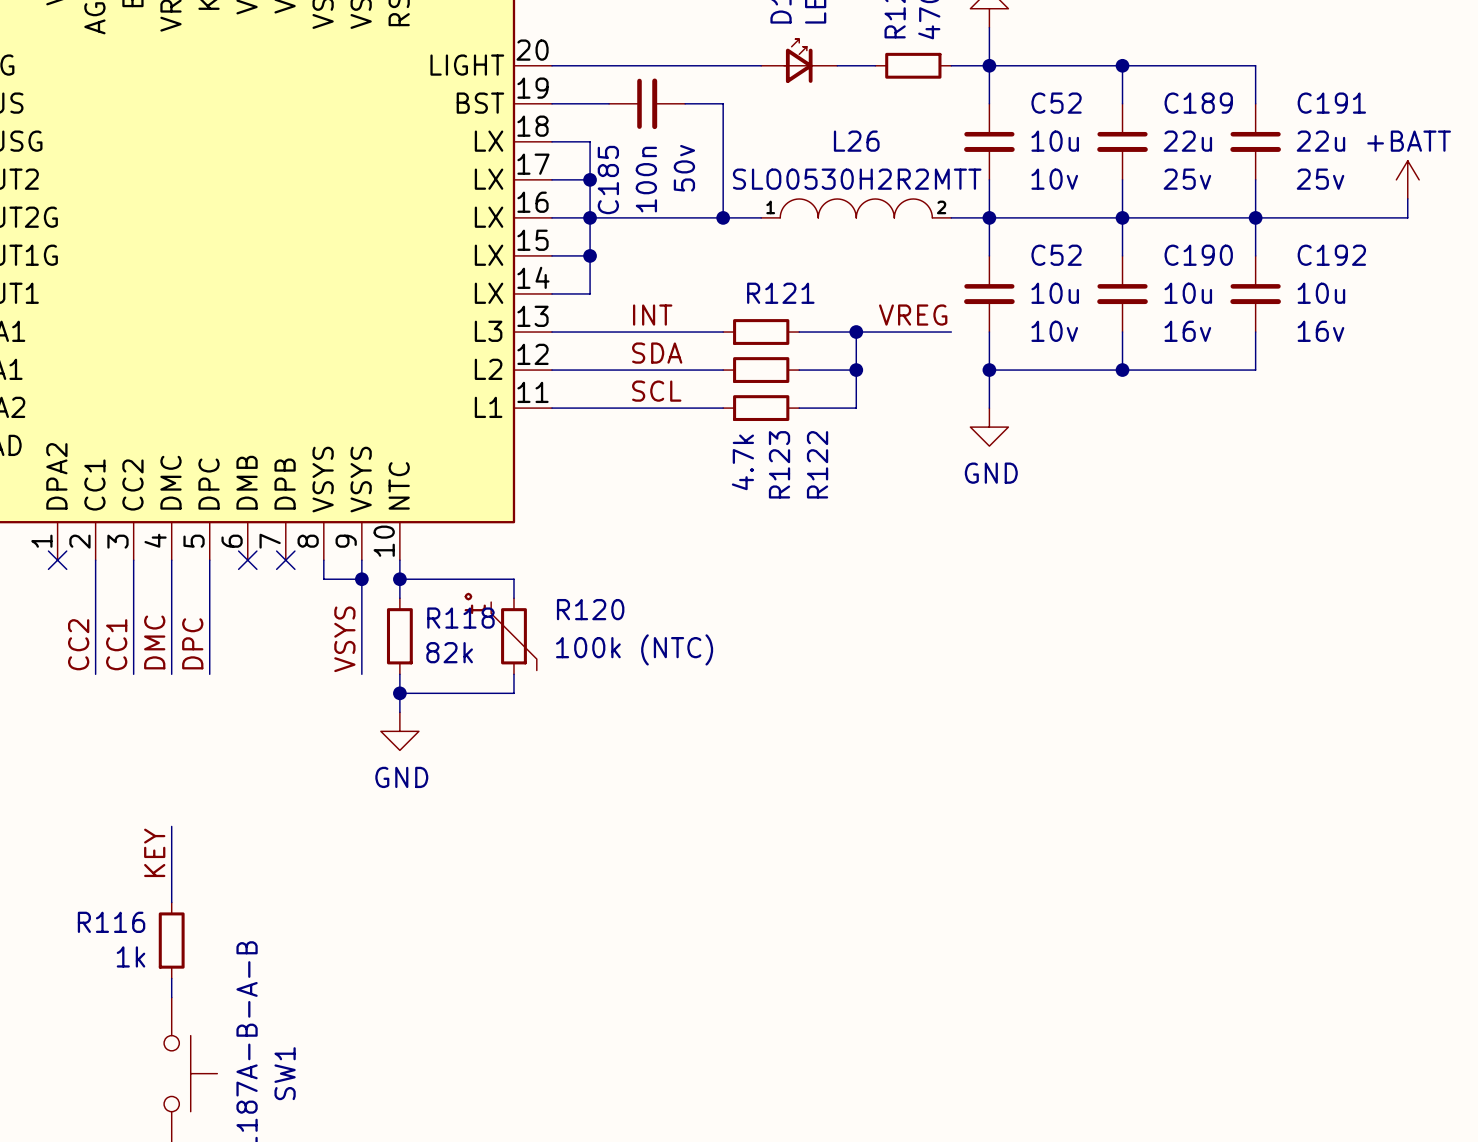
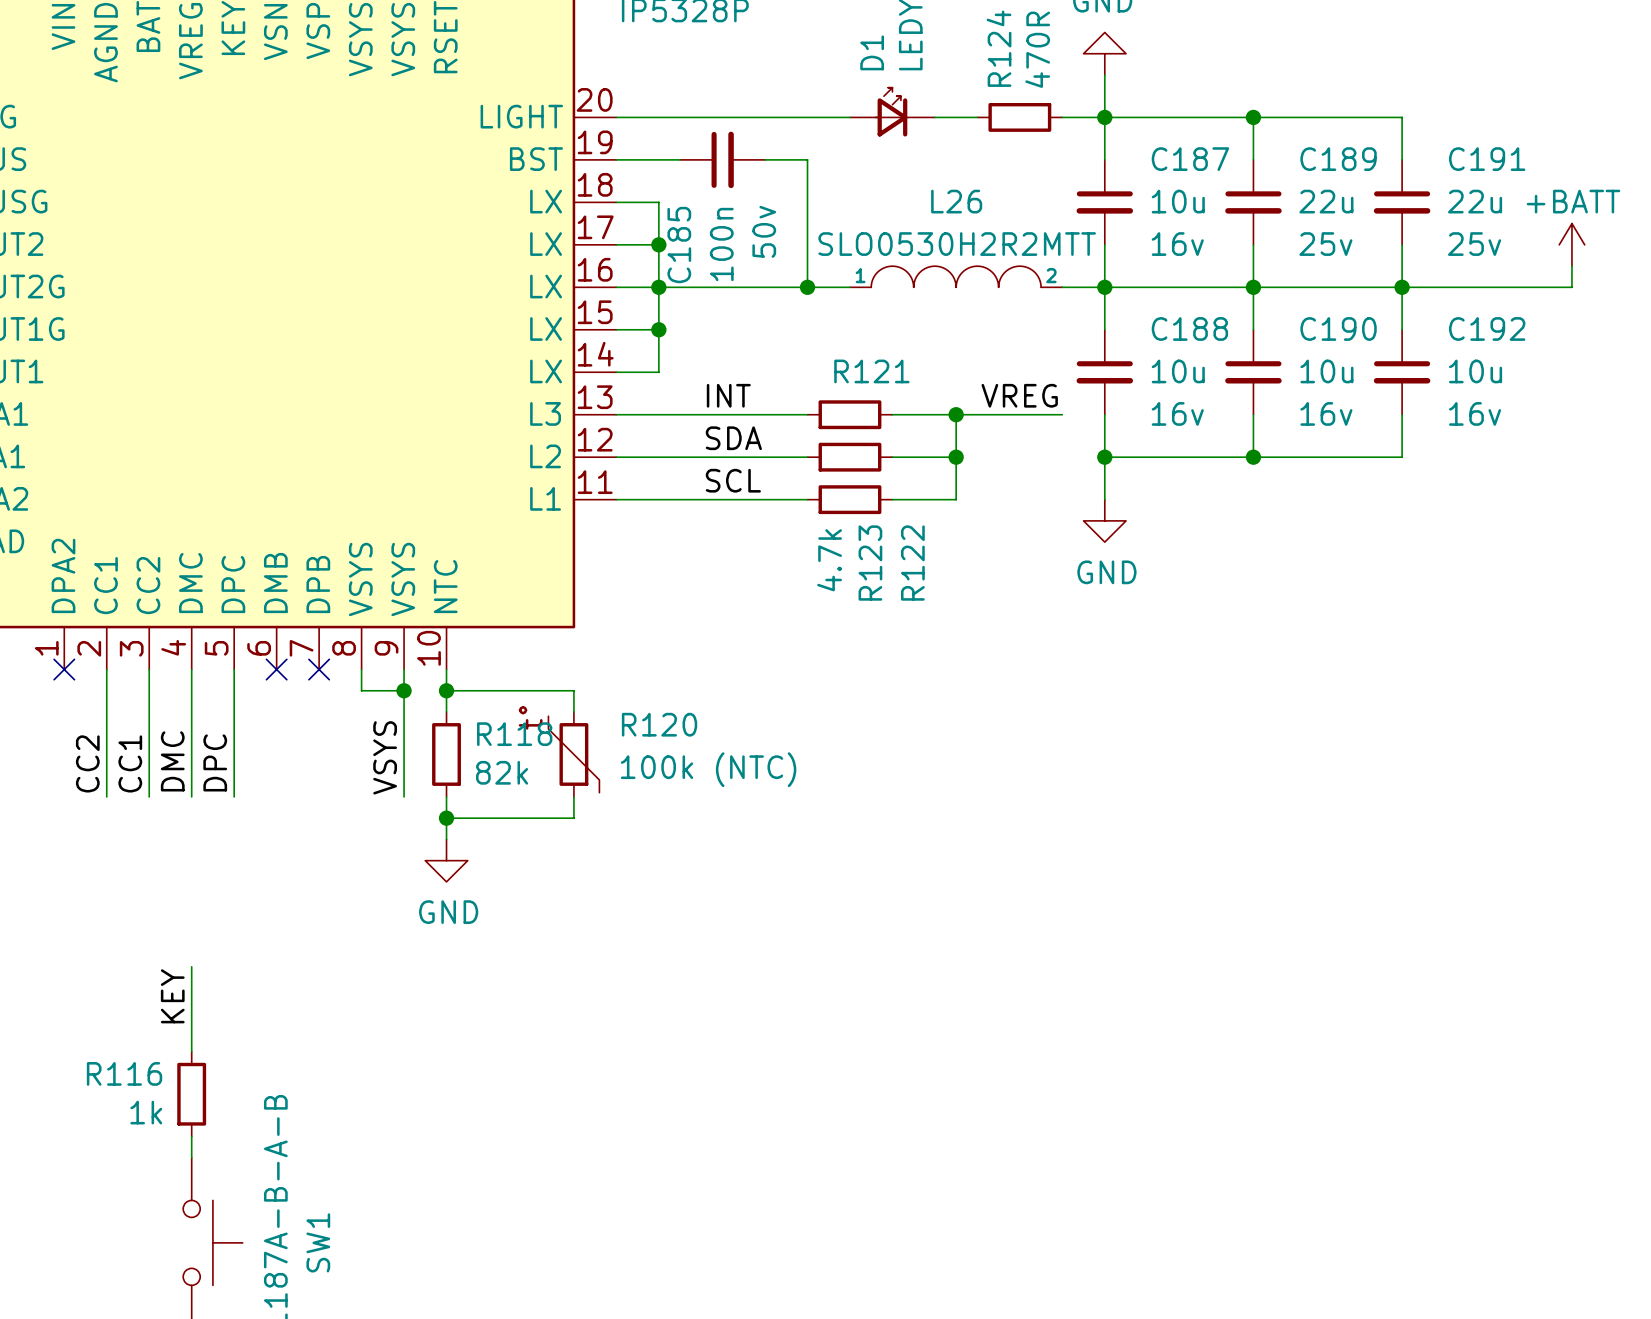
C52 name: C52 (1056, 103) -> C187 (1190, 159)
C52 text: 10v (1054, 179) -> 16v (1177, 244)
C52 name: C52 (1056, 255) -> C188 (1189, 328)
C52 text: 10v (1054, 331) -> 16v (1177, 413)

